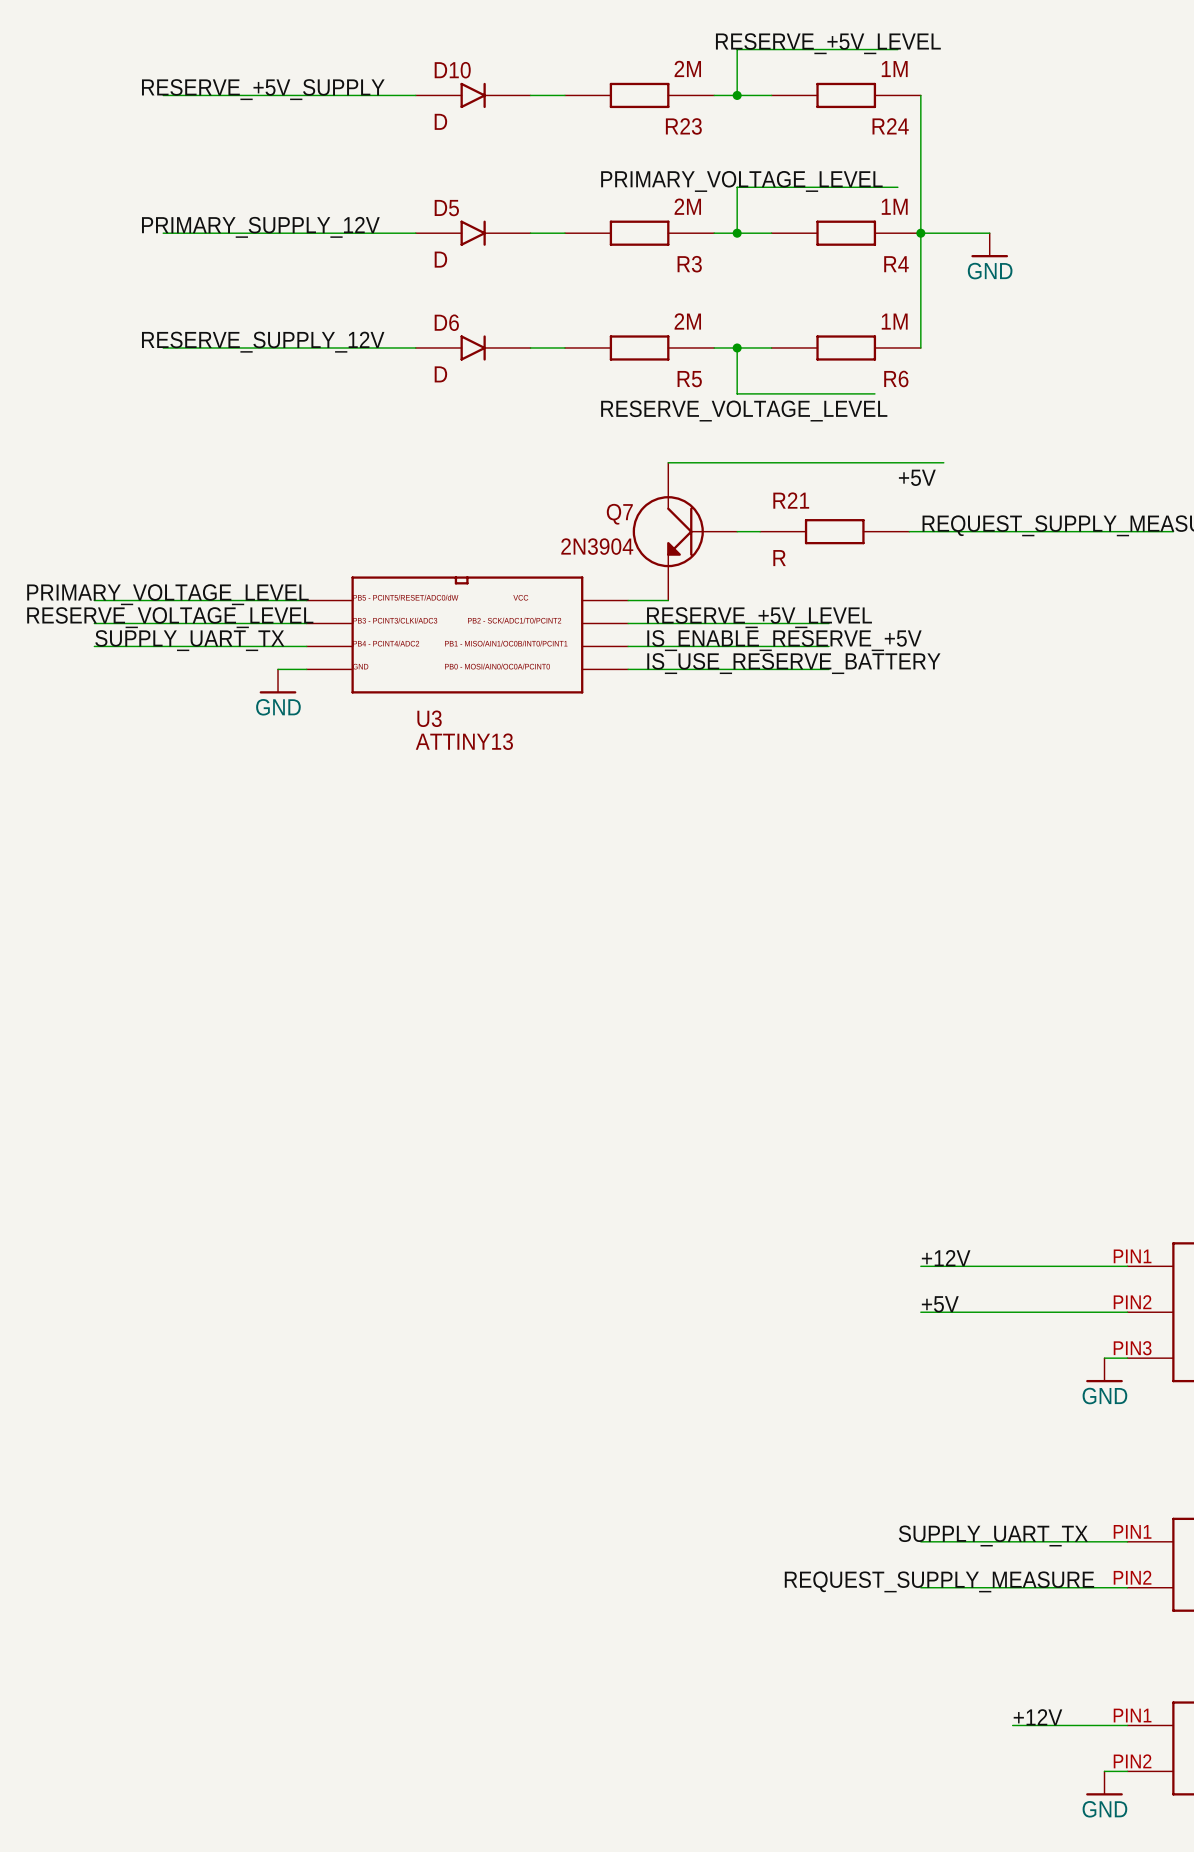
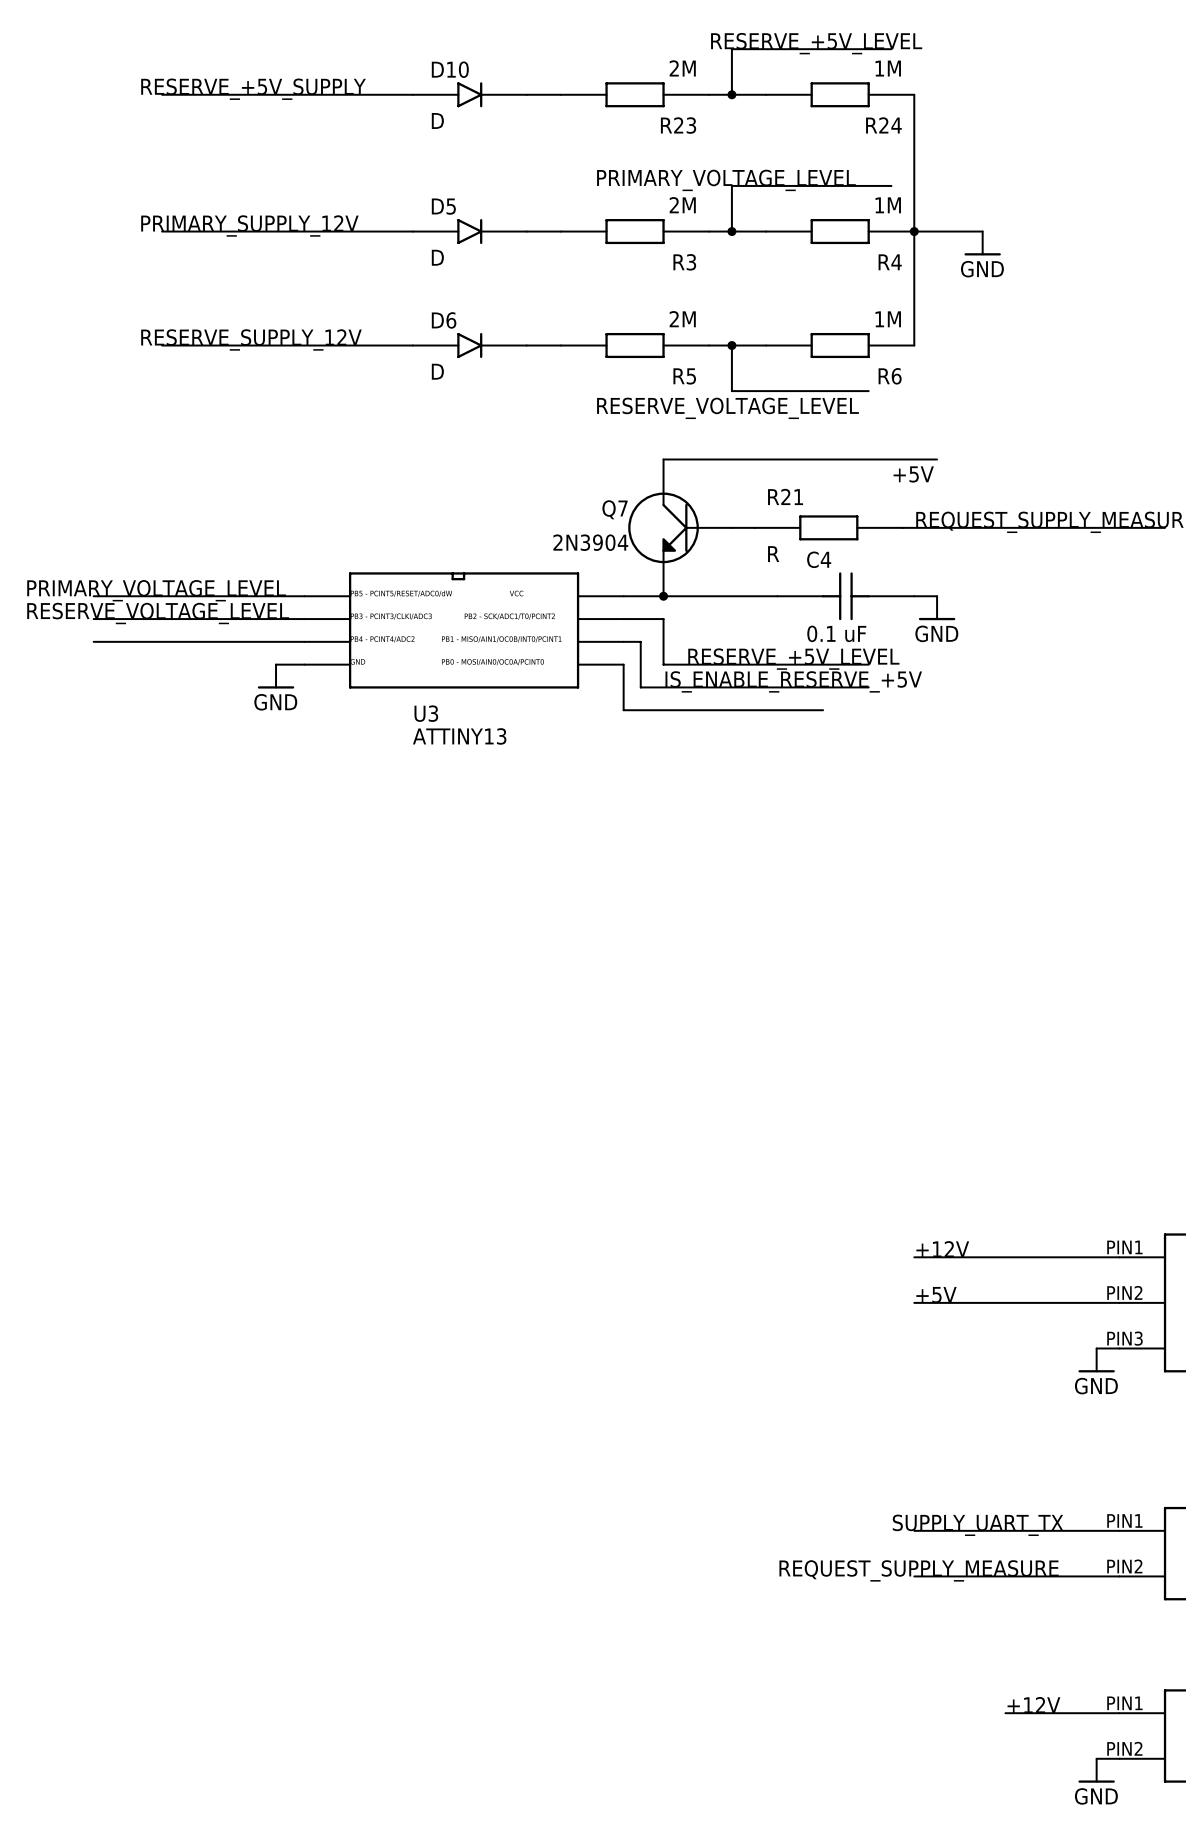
wire: none -> (663, 596) (777, 596)
junction: none -> (663, 596)
C4: none -> 0.1 uF (845, 596)
wire: none -> (914, 596) (937, 596)
power symbol: none -> GND (937, 608)
label position: RESERVE_+5V_LEVEL (759, 617) -> RESERVE_+5V_LEVEL (793, 659)
wire: (668, 623) (829, 623) -> none
label: SUPPLY_UART_TX (189, 640) -> none
label position: IS_ENABLE_RESERVE_+5V (784, 640) -> IS_ENABLE_RESERVE_+5V (793, 681)
wire: (645, 646) (829, 646) -> (640, 641) (640, 687) (868, 687)
label: IS_USE_RESERVE_BATTERY (793, 663) -> none
wire: (628, 669) (668, 669) -> (663, 619) (663, 664)
wire: none -> (623, 664) (623, 710) (823, 710)
wire: none -> (823, 664) (868, 664)

